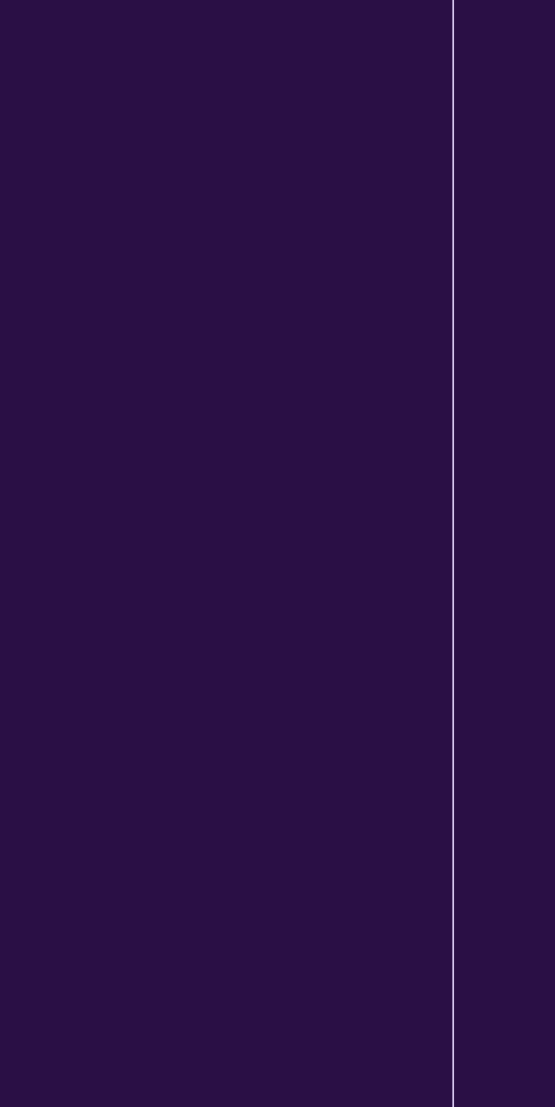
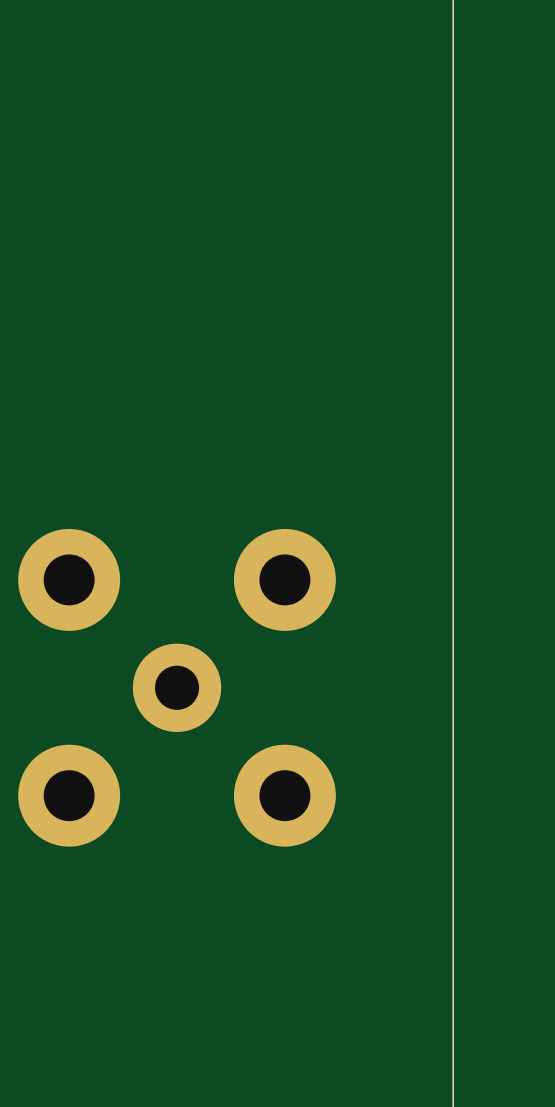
part: none -> (177, 687)

